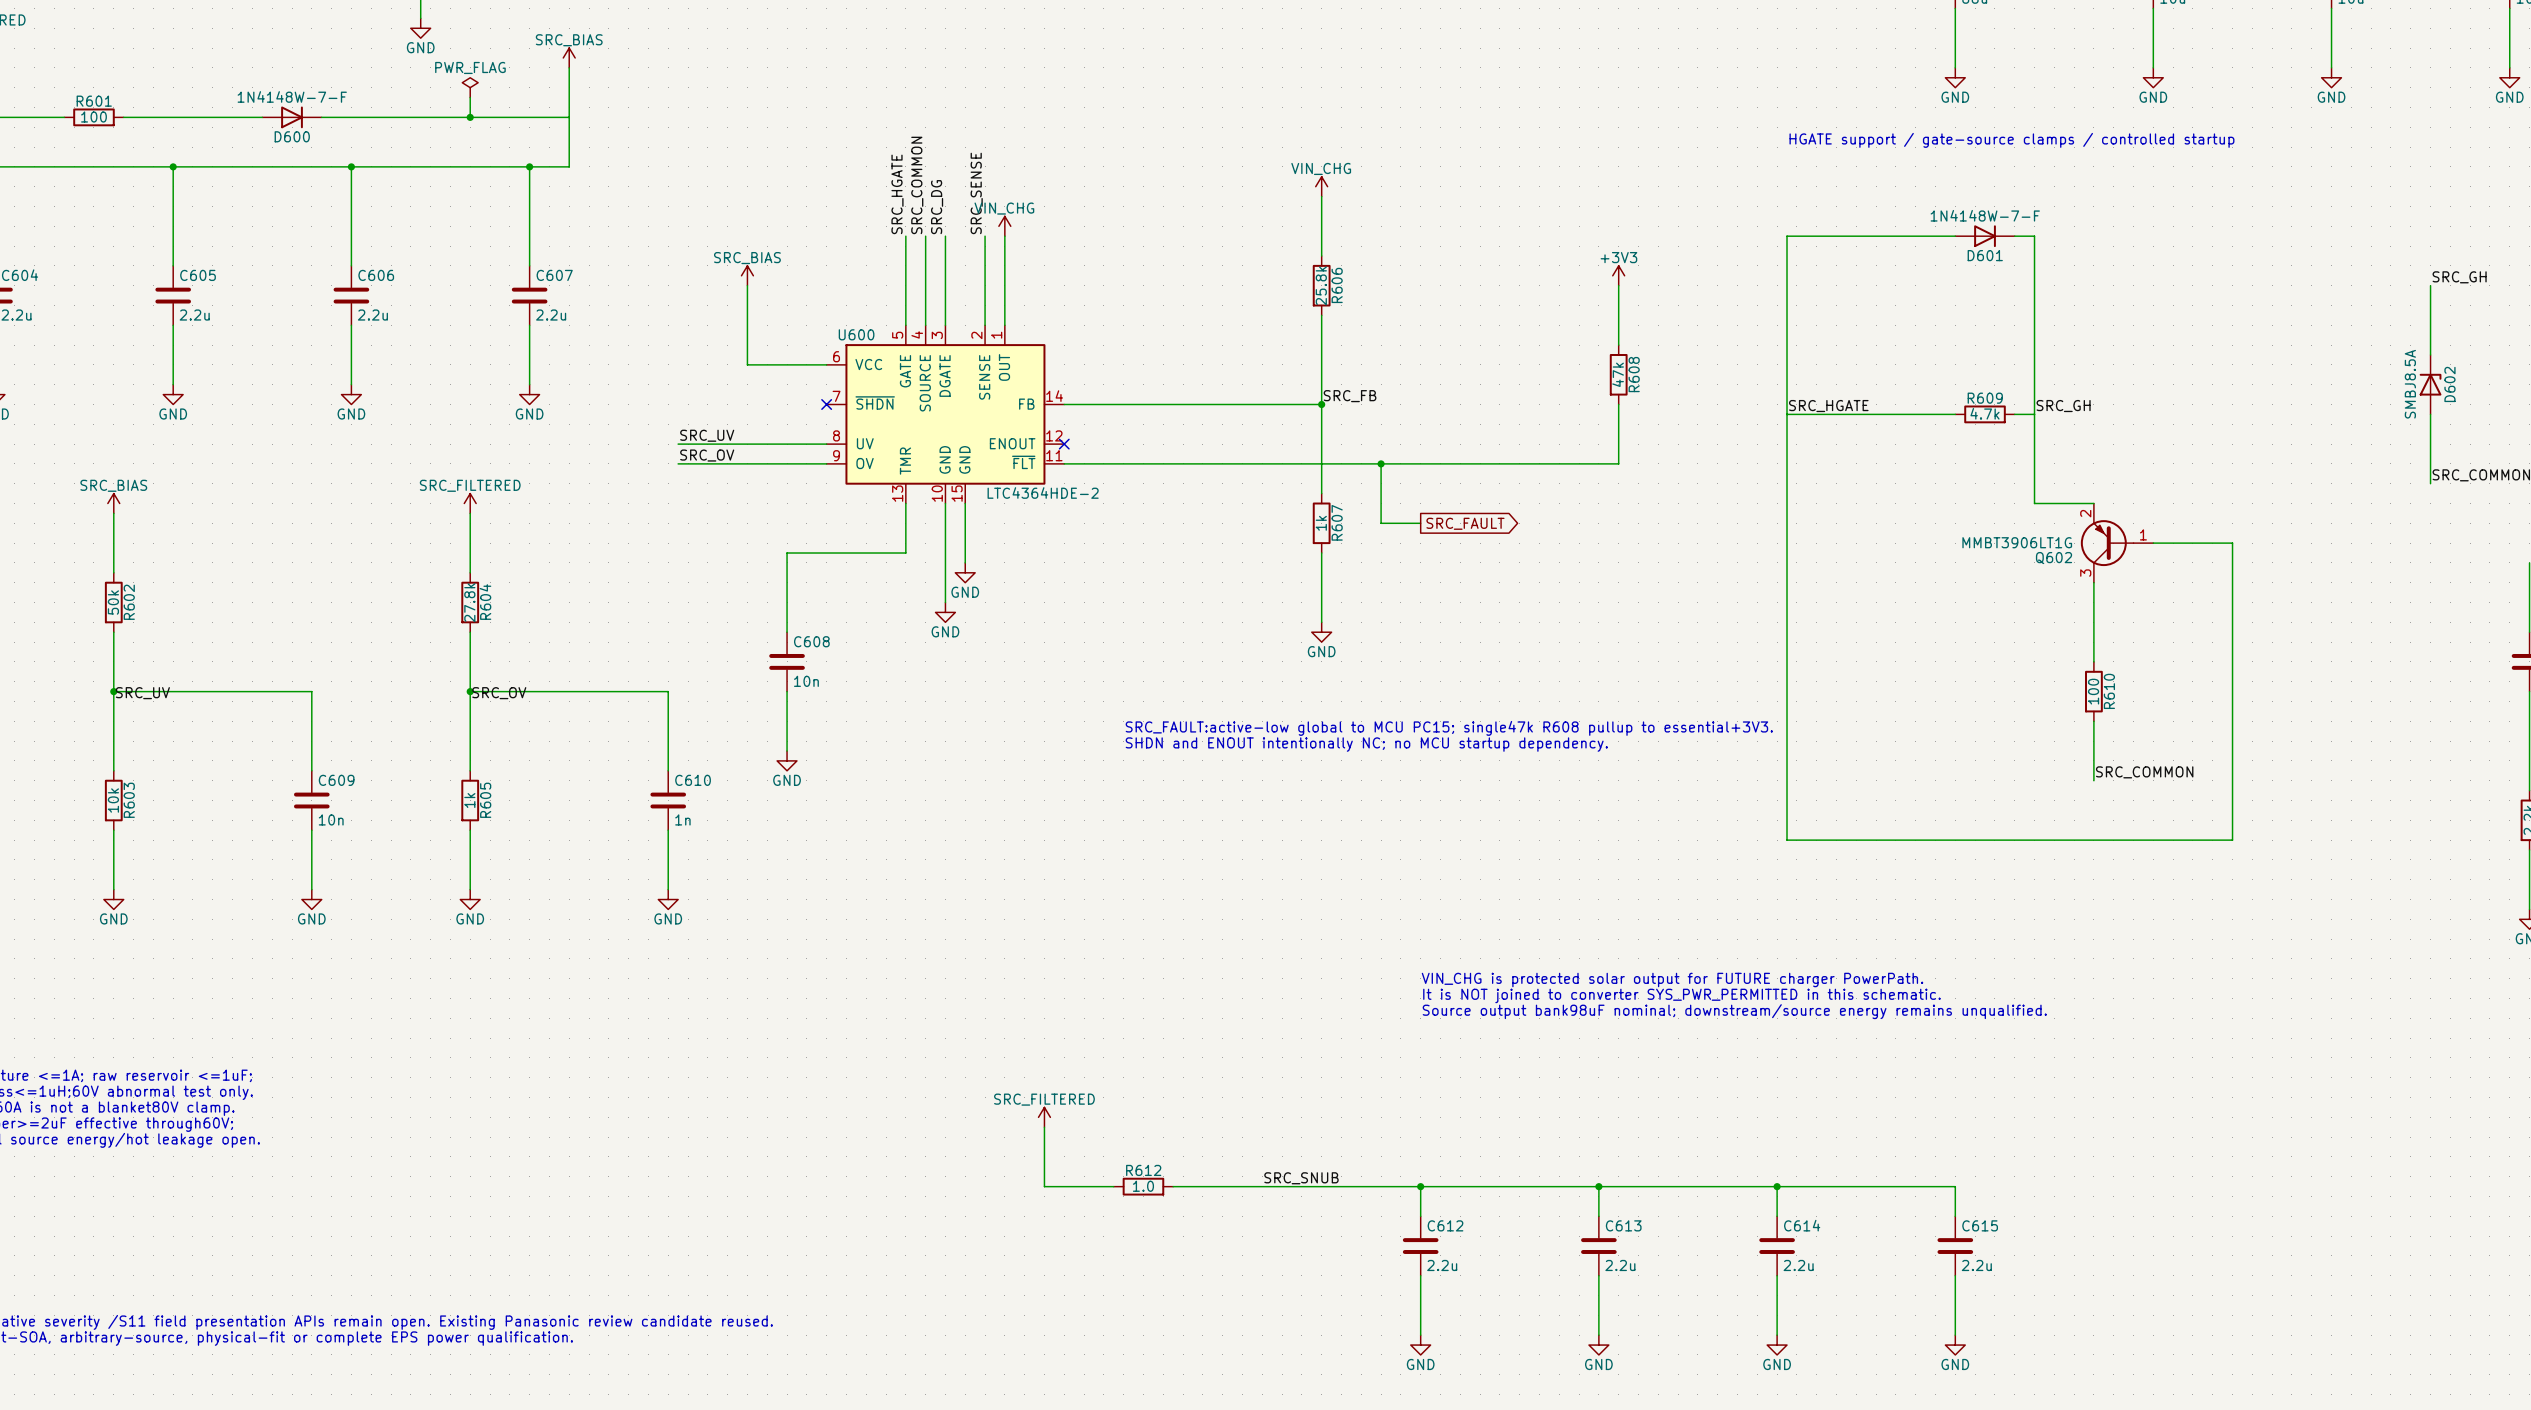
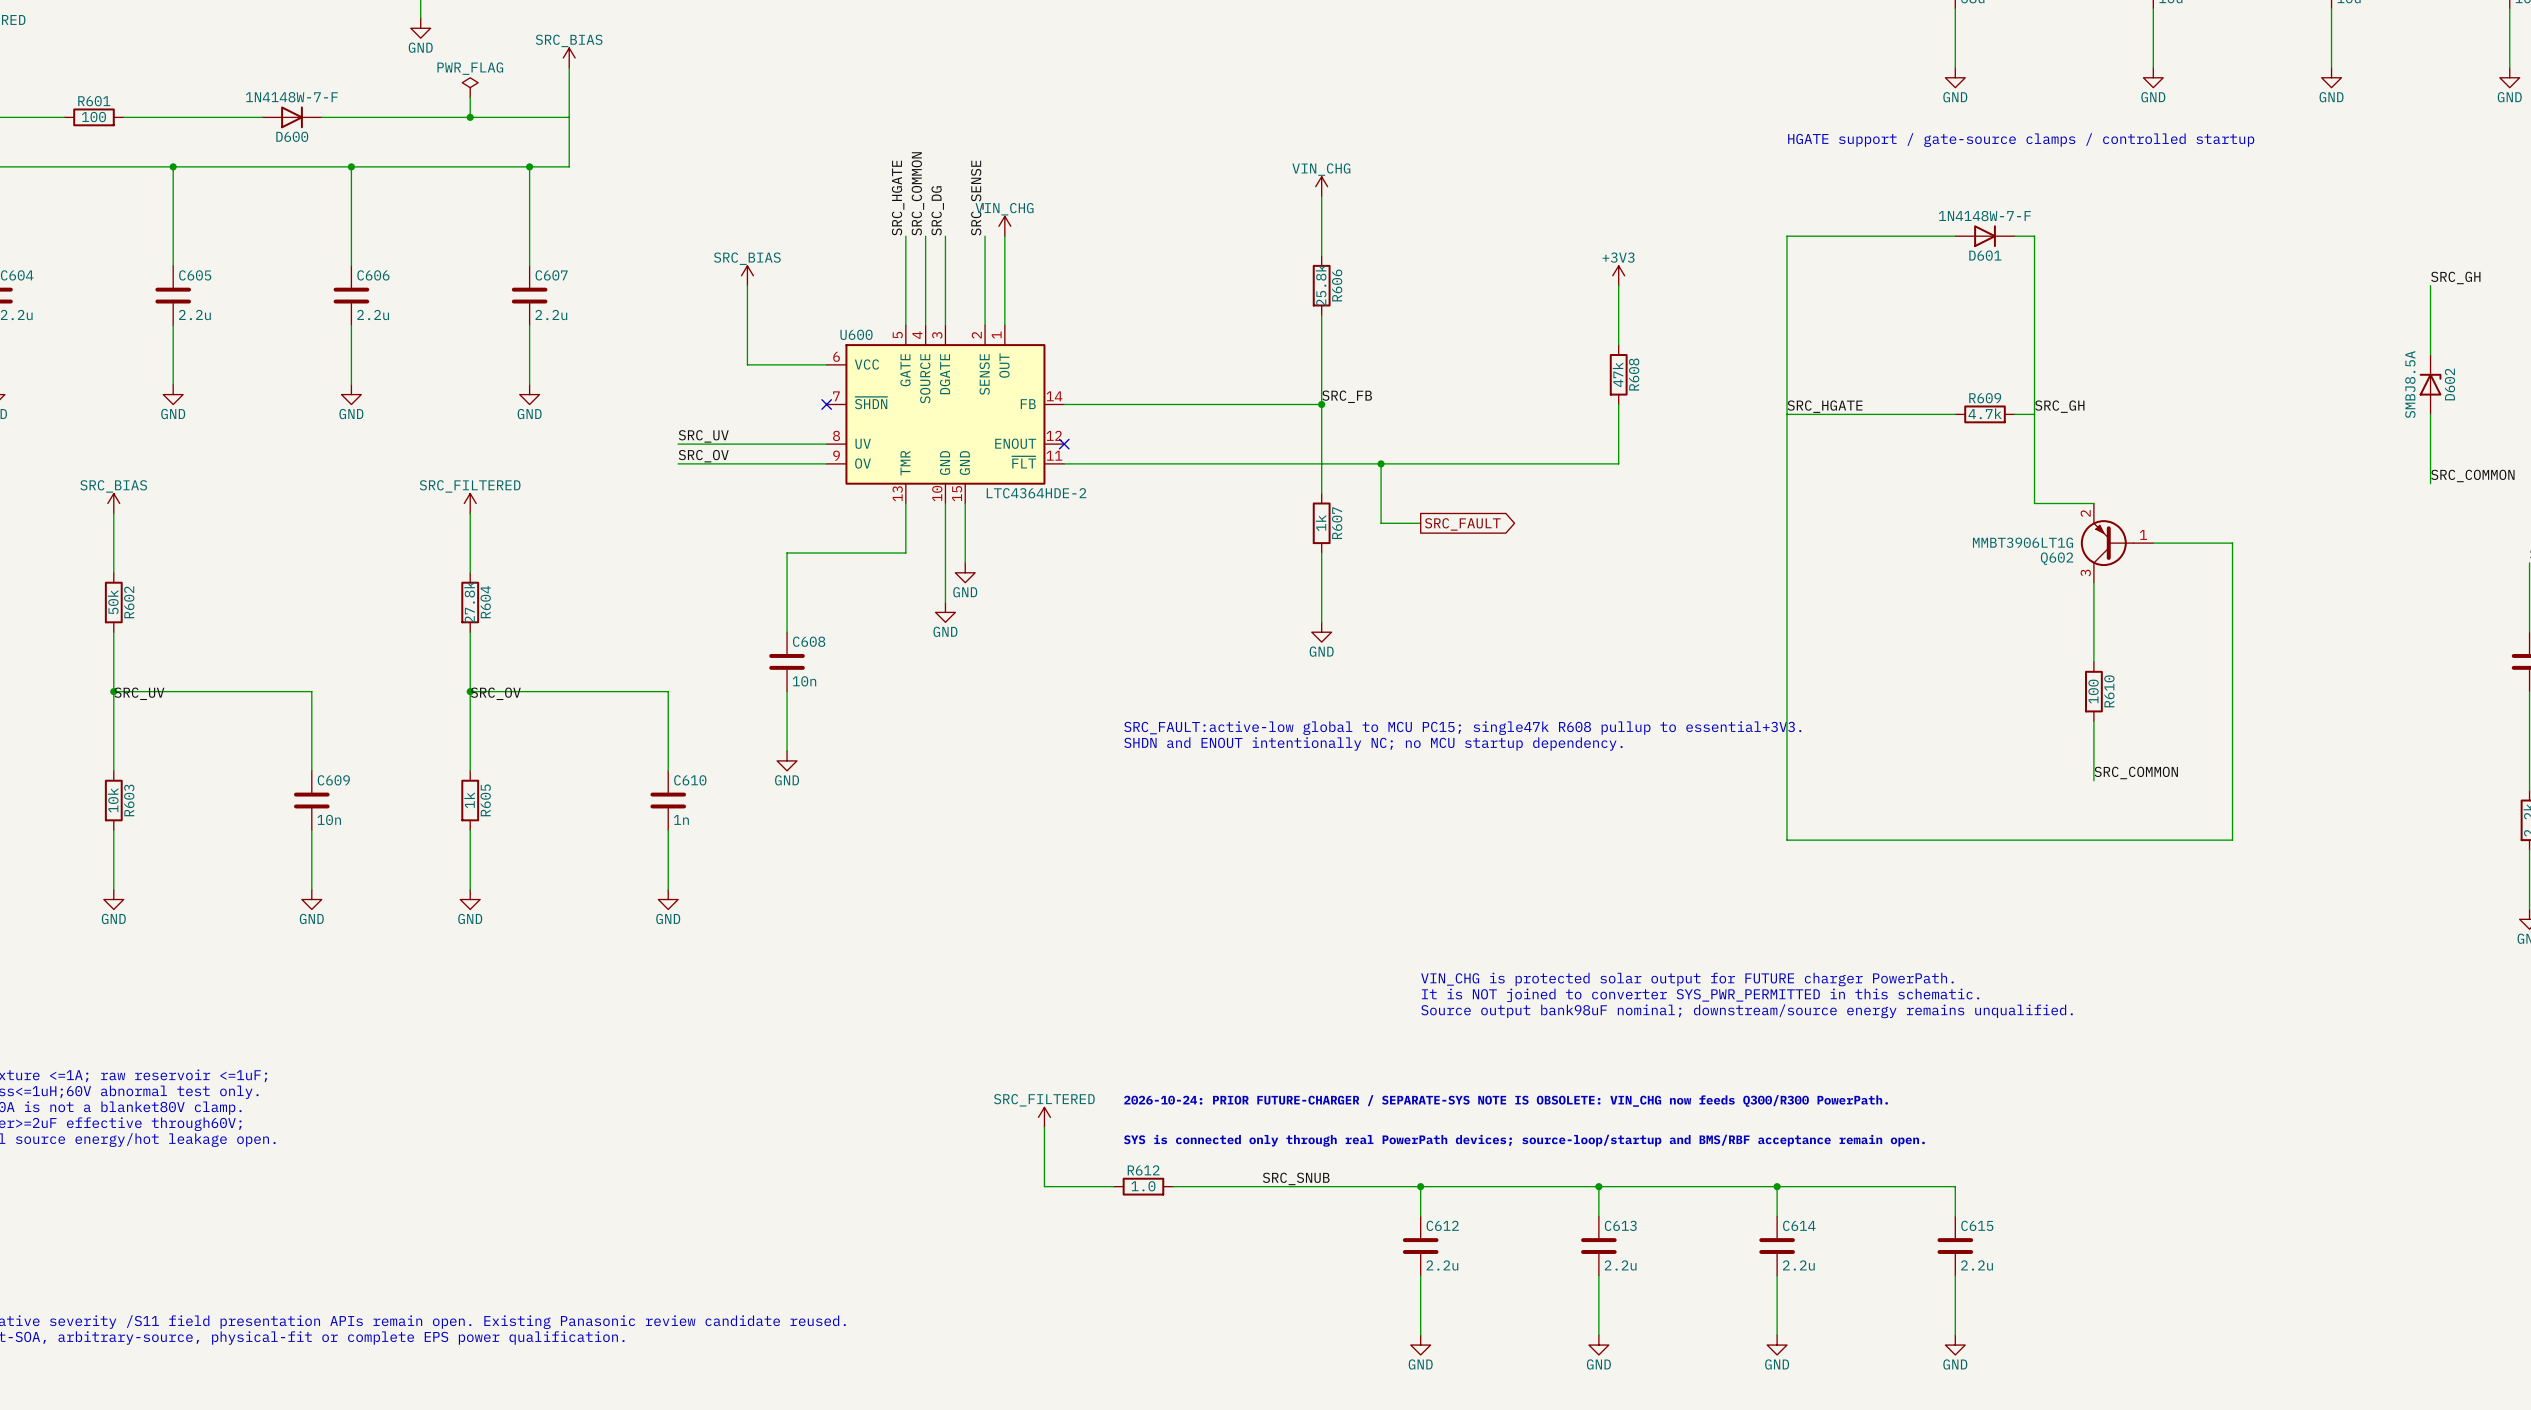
text: none -> 2026-10-24: PRIOR FUTURE-CHARGER / SEPARATE-SYS NOTE IS OBSOLETE: VIN_CHG now feeds Q300/R300 PowerPath. (1506, 1100)
text: none -> SYS is connected only through real PowerPath devices; source-loop/startup and BMS/RBF acceptance remain open. (1524, 1140)

